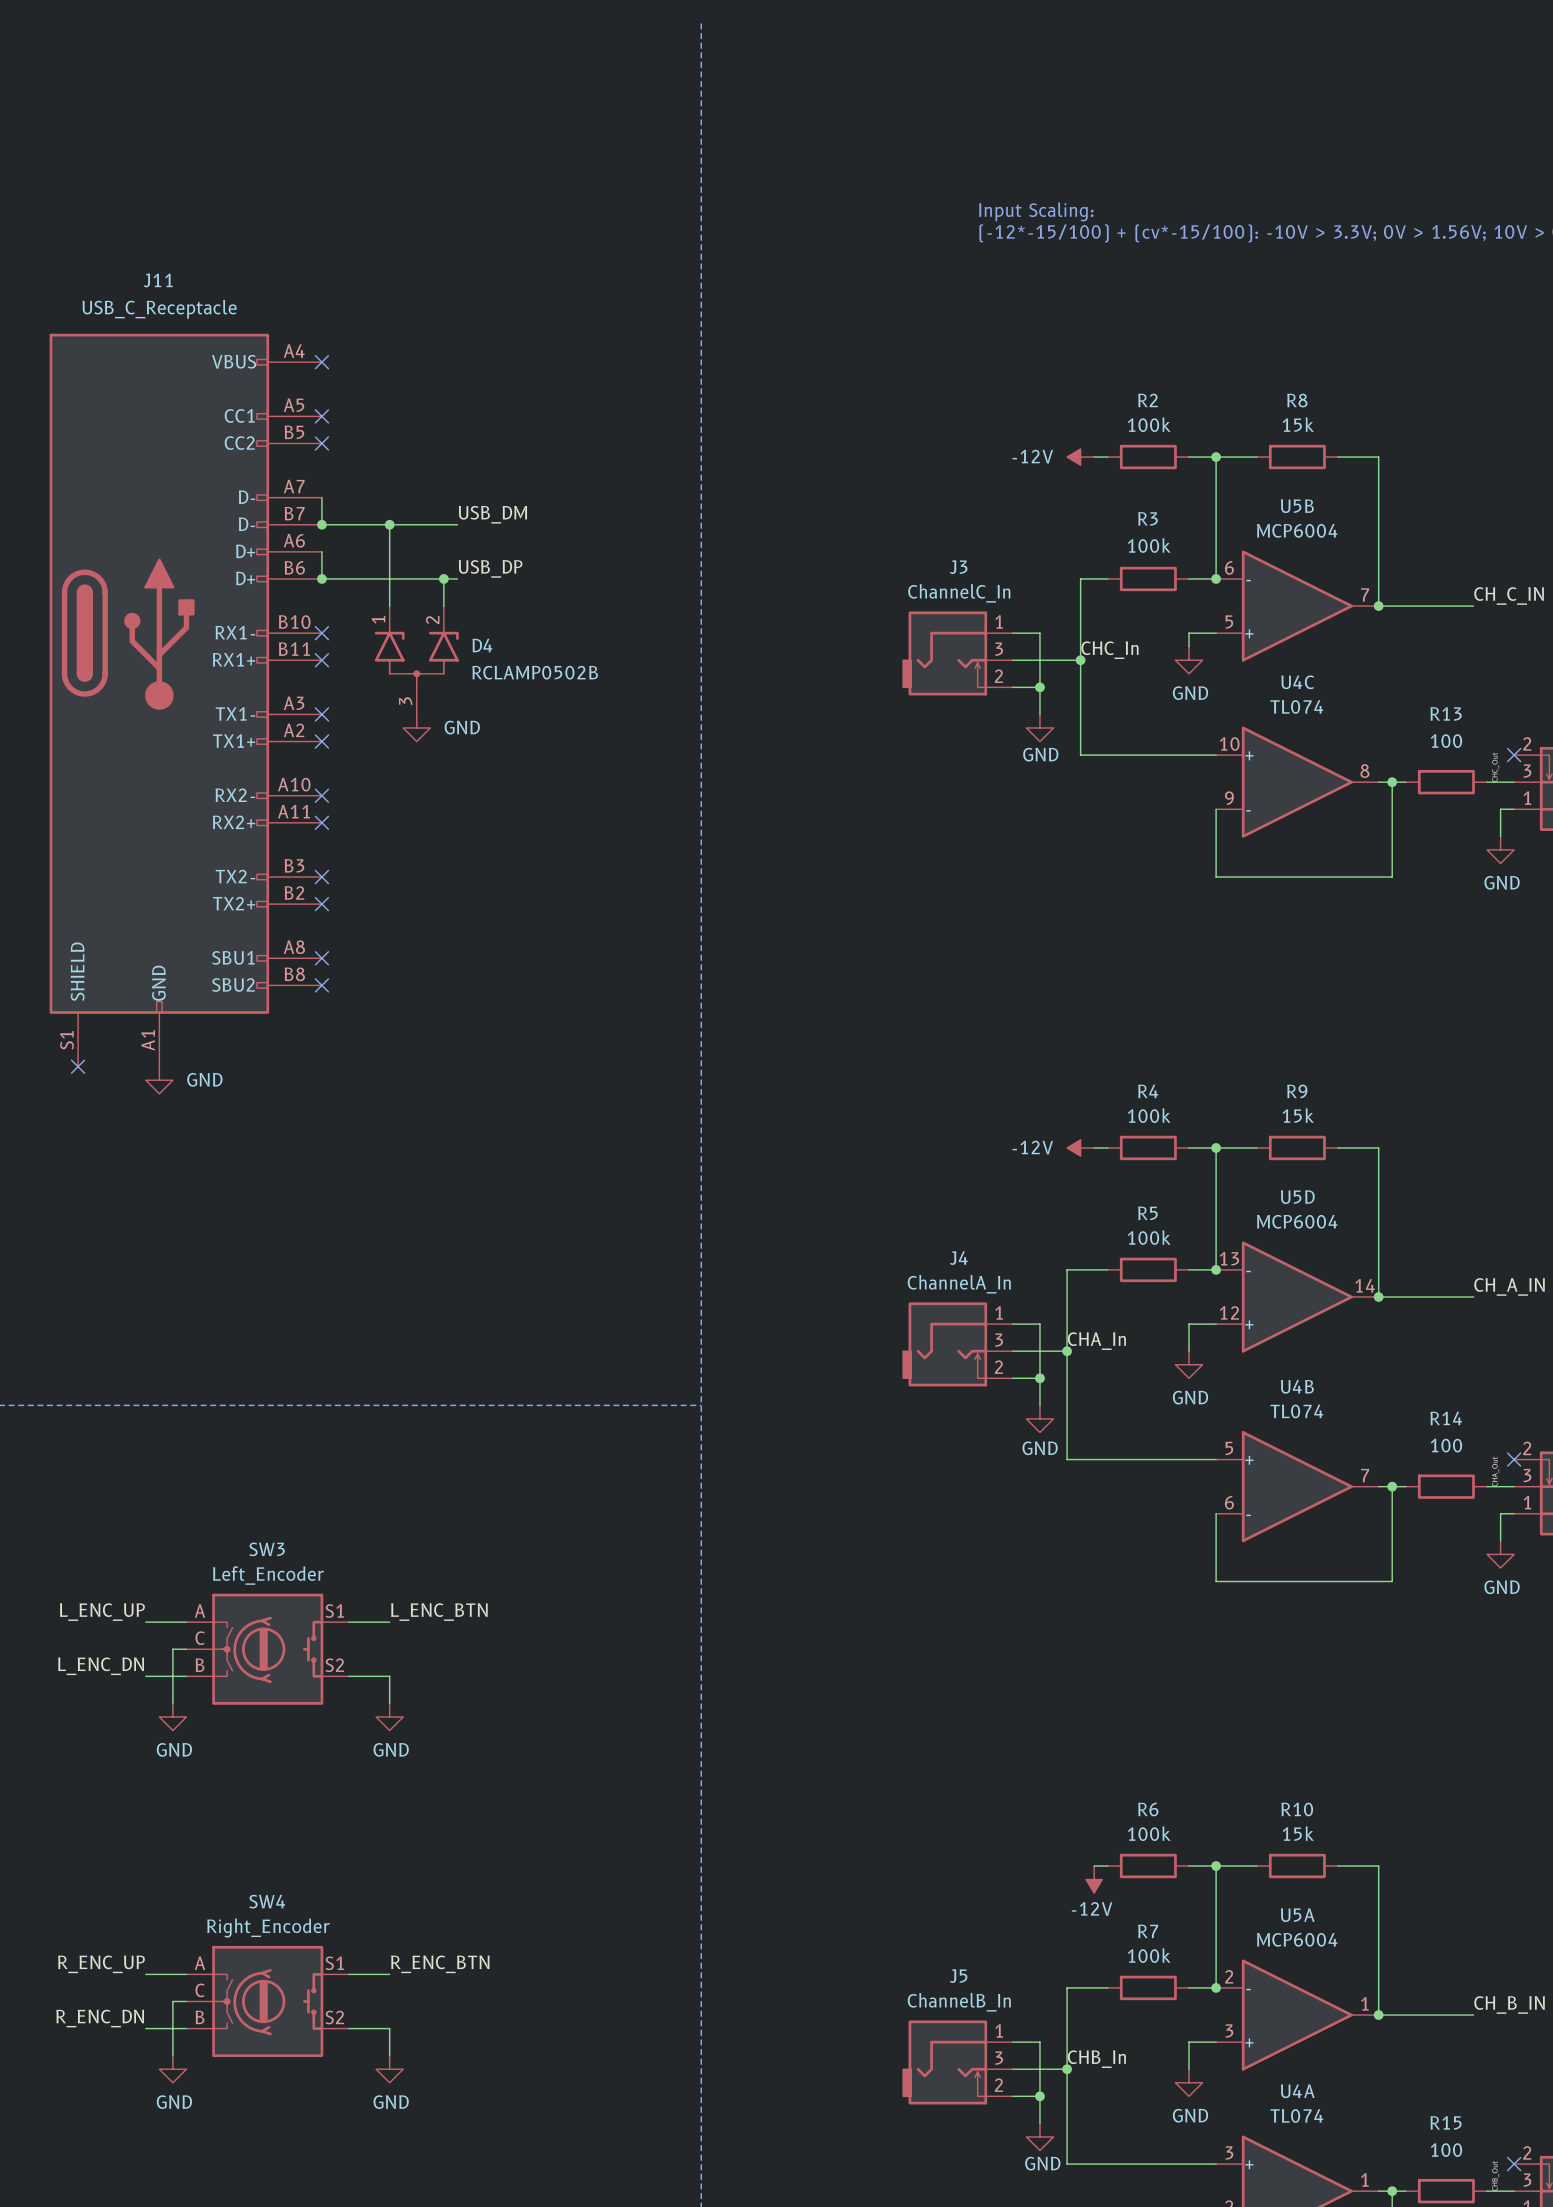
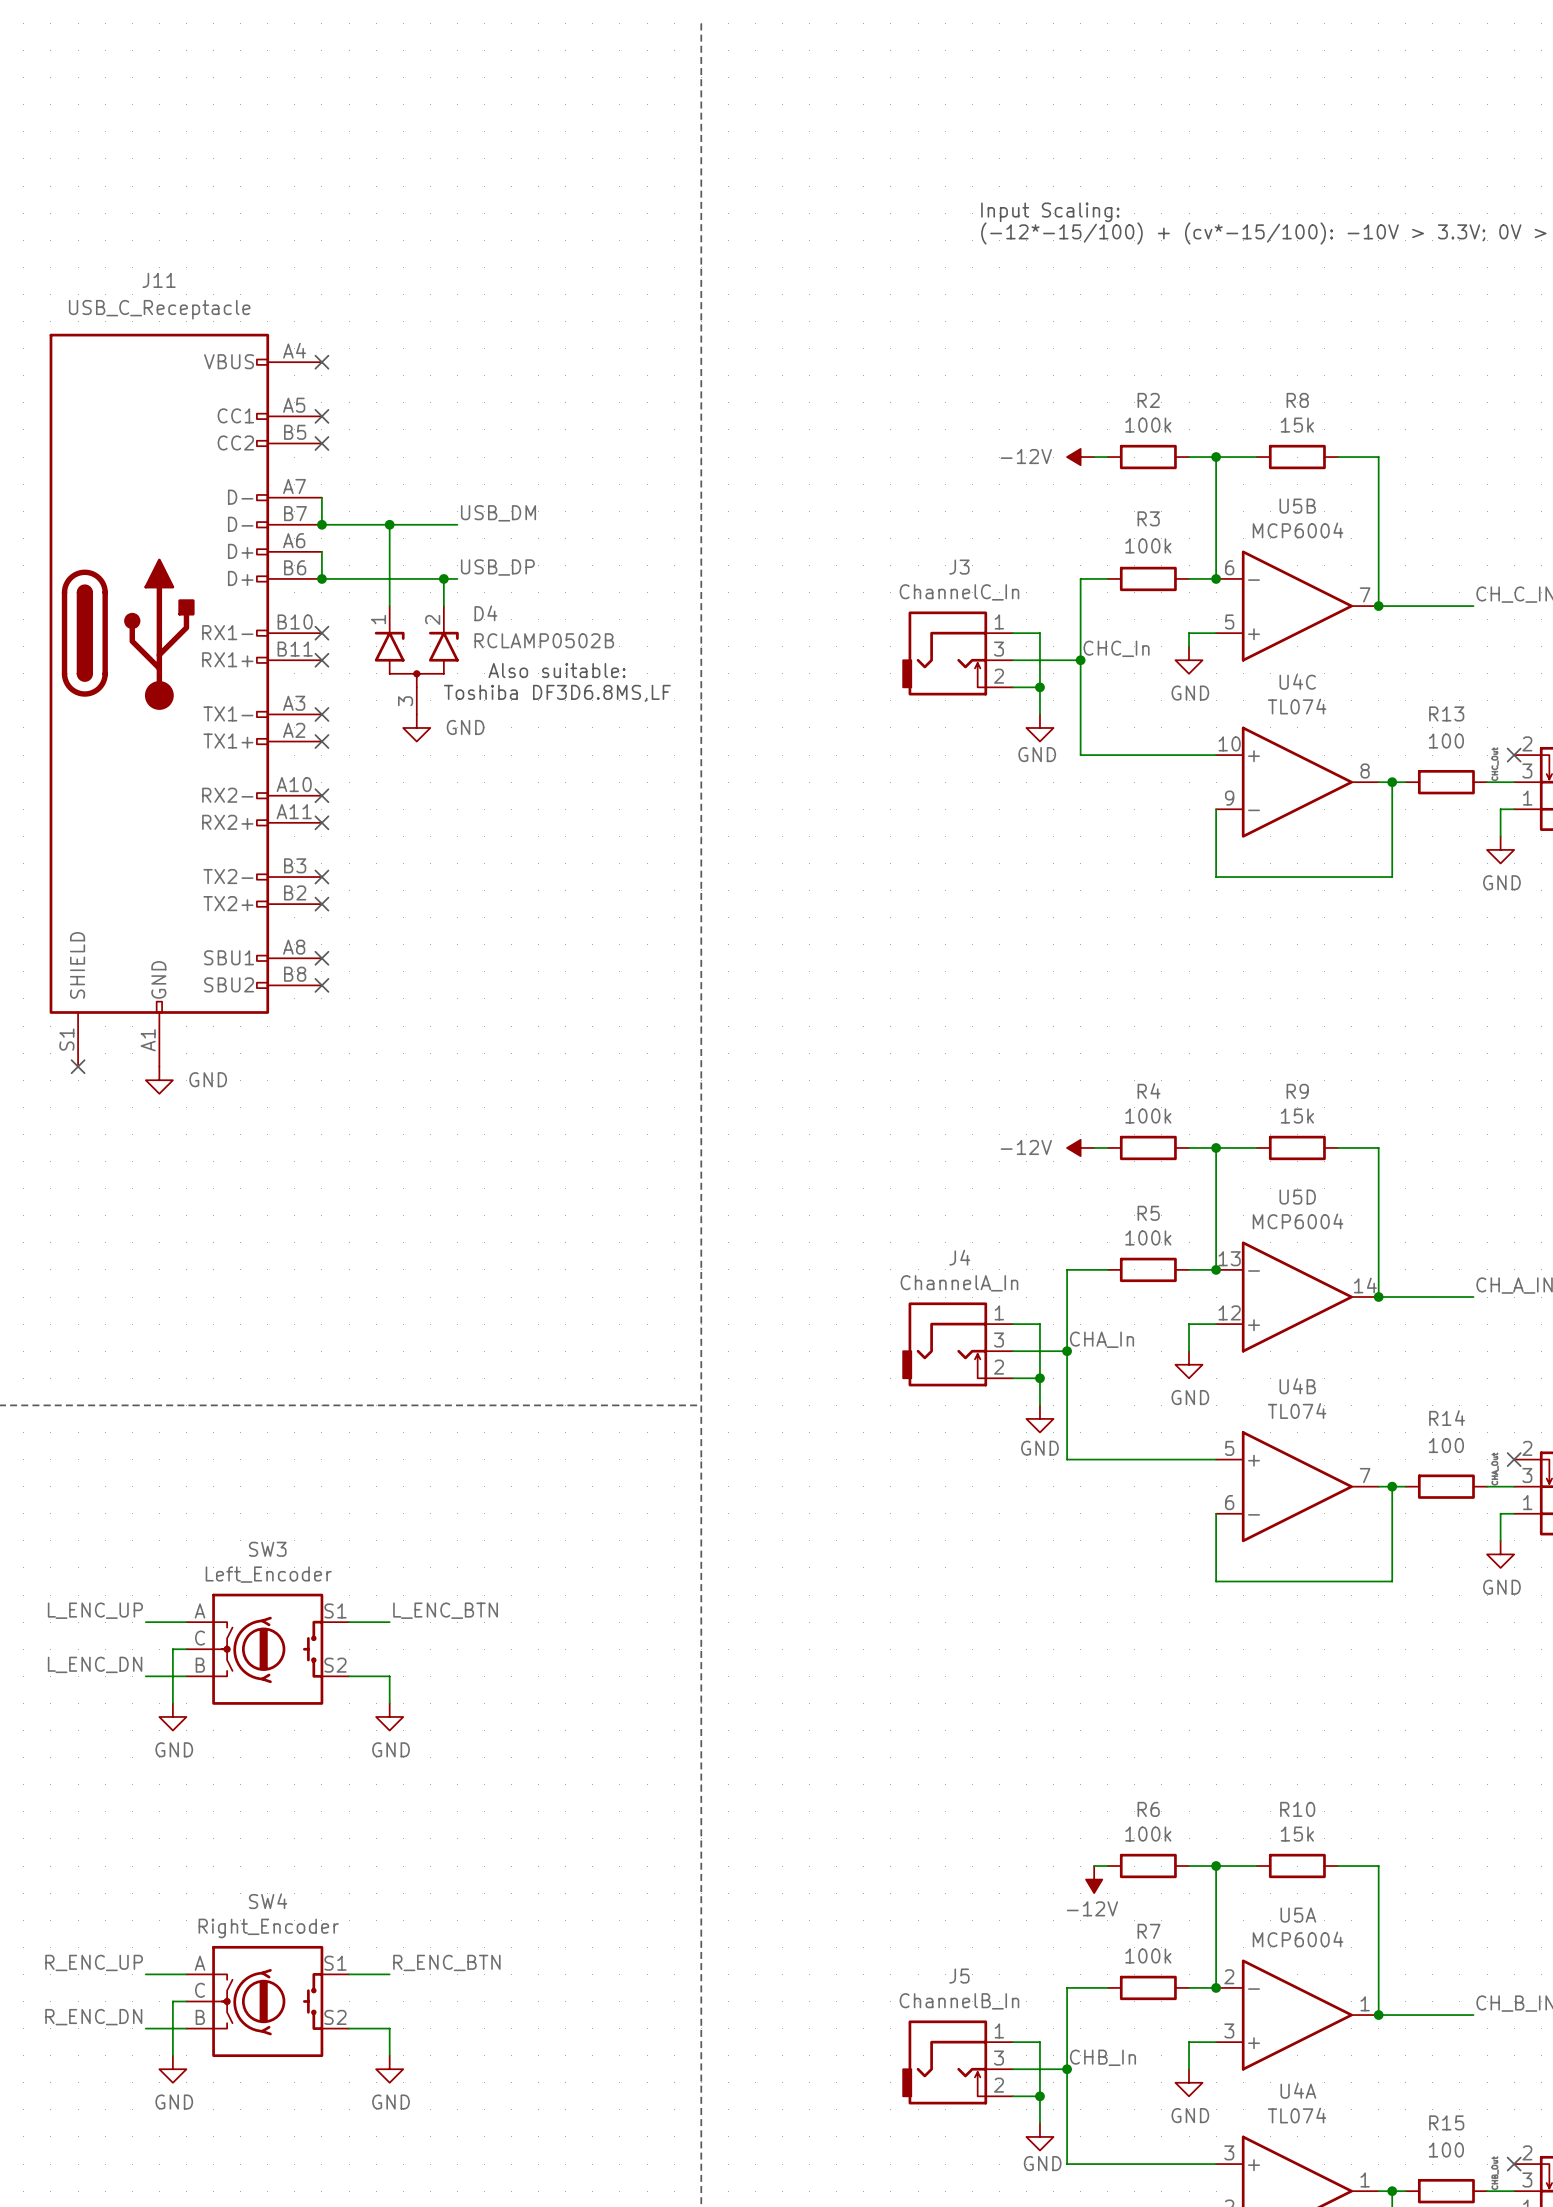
D4 name position: D4 (482, 645) -> D4 (485, 613)
text: none -> Also suitable: (557, 670)
D4 value position: RCLAMP0502B (535, 672) -> RCLAMP0502B (544, 640)
text: none -> Toshiba DF3D6.8MS,LF (557, 693)

